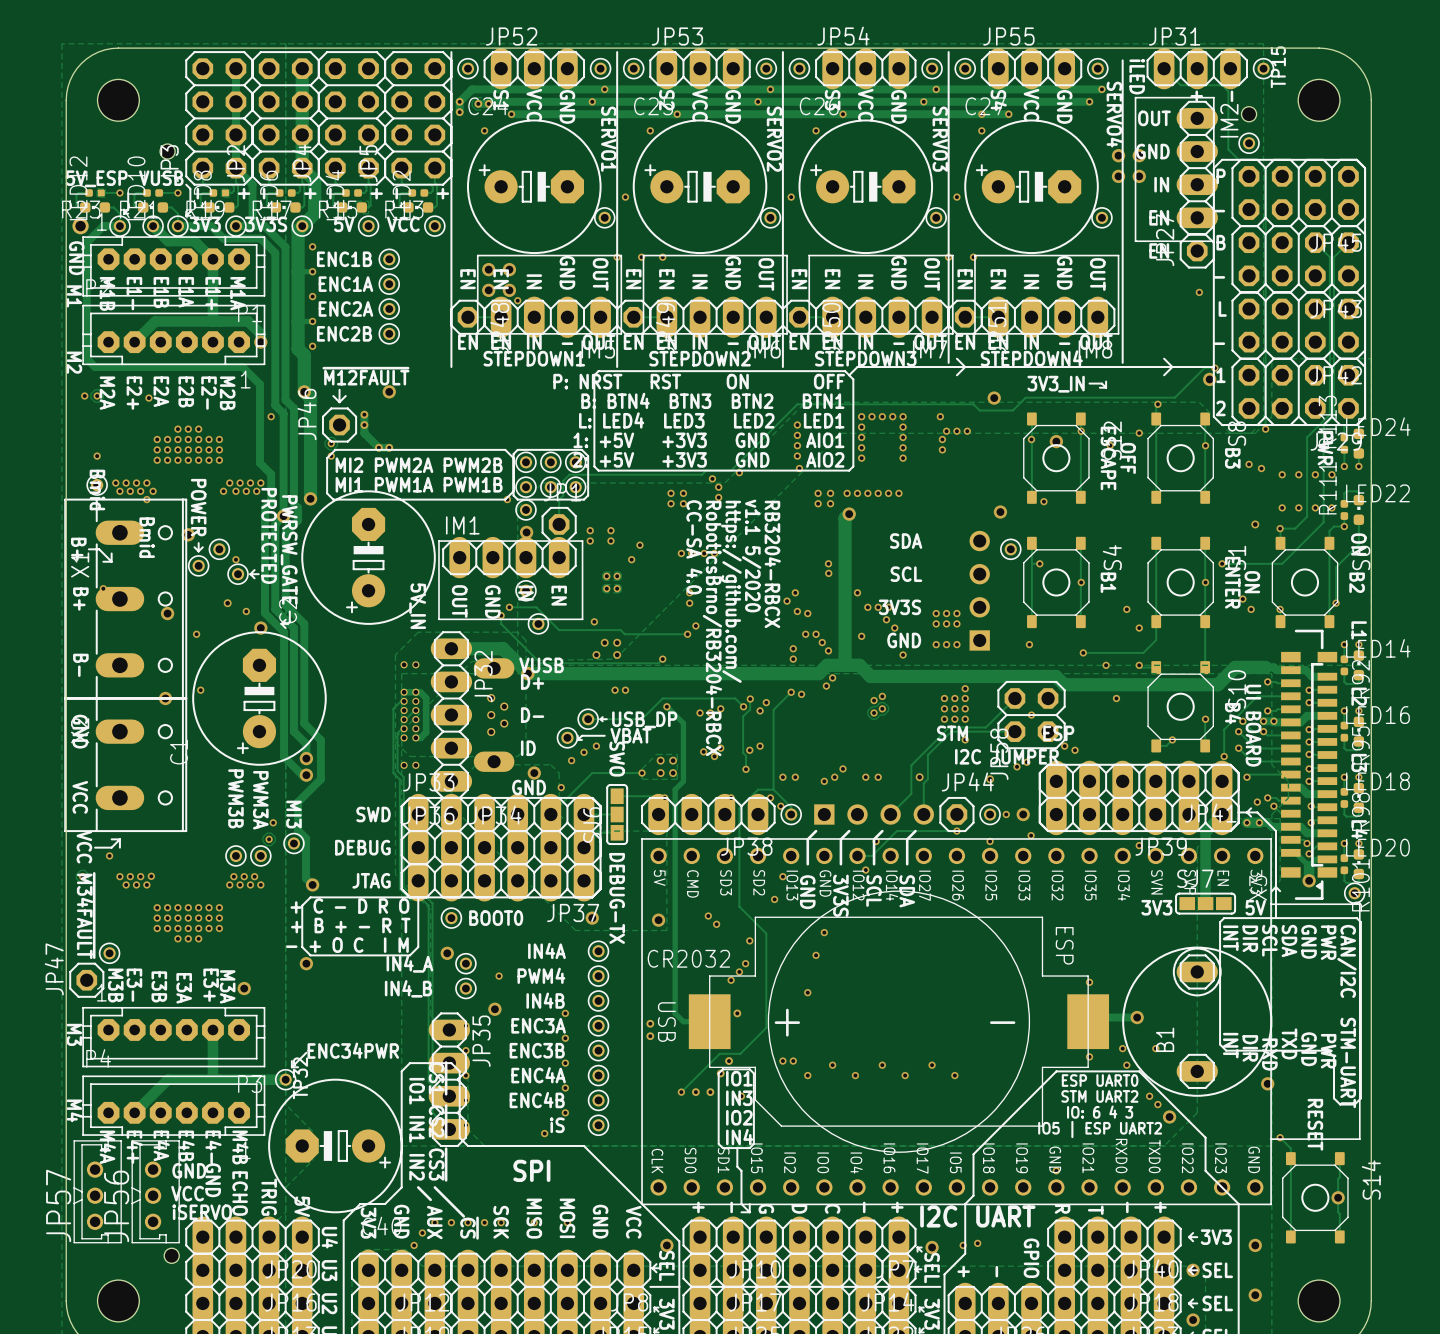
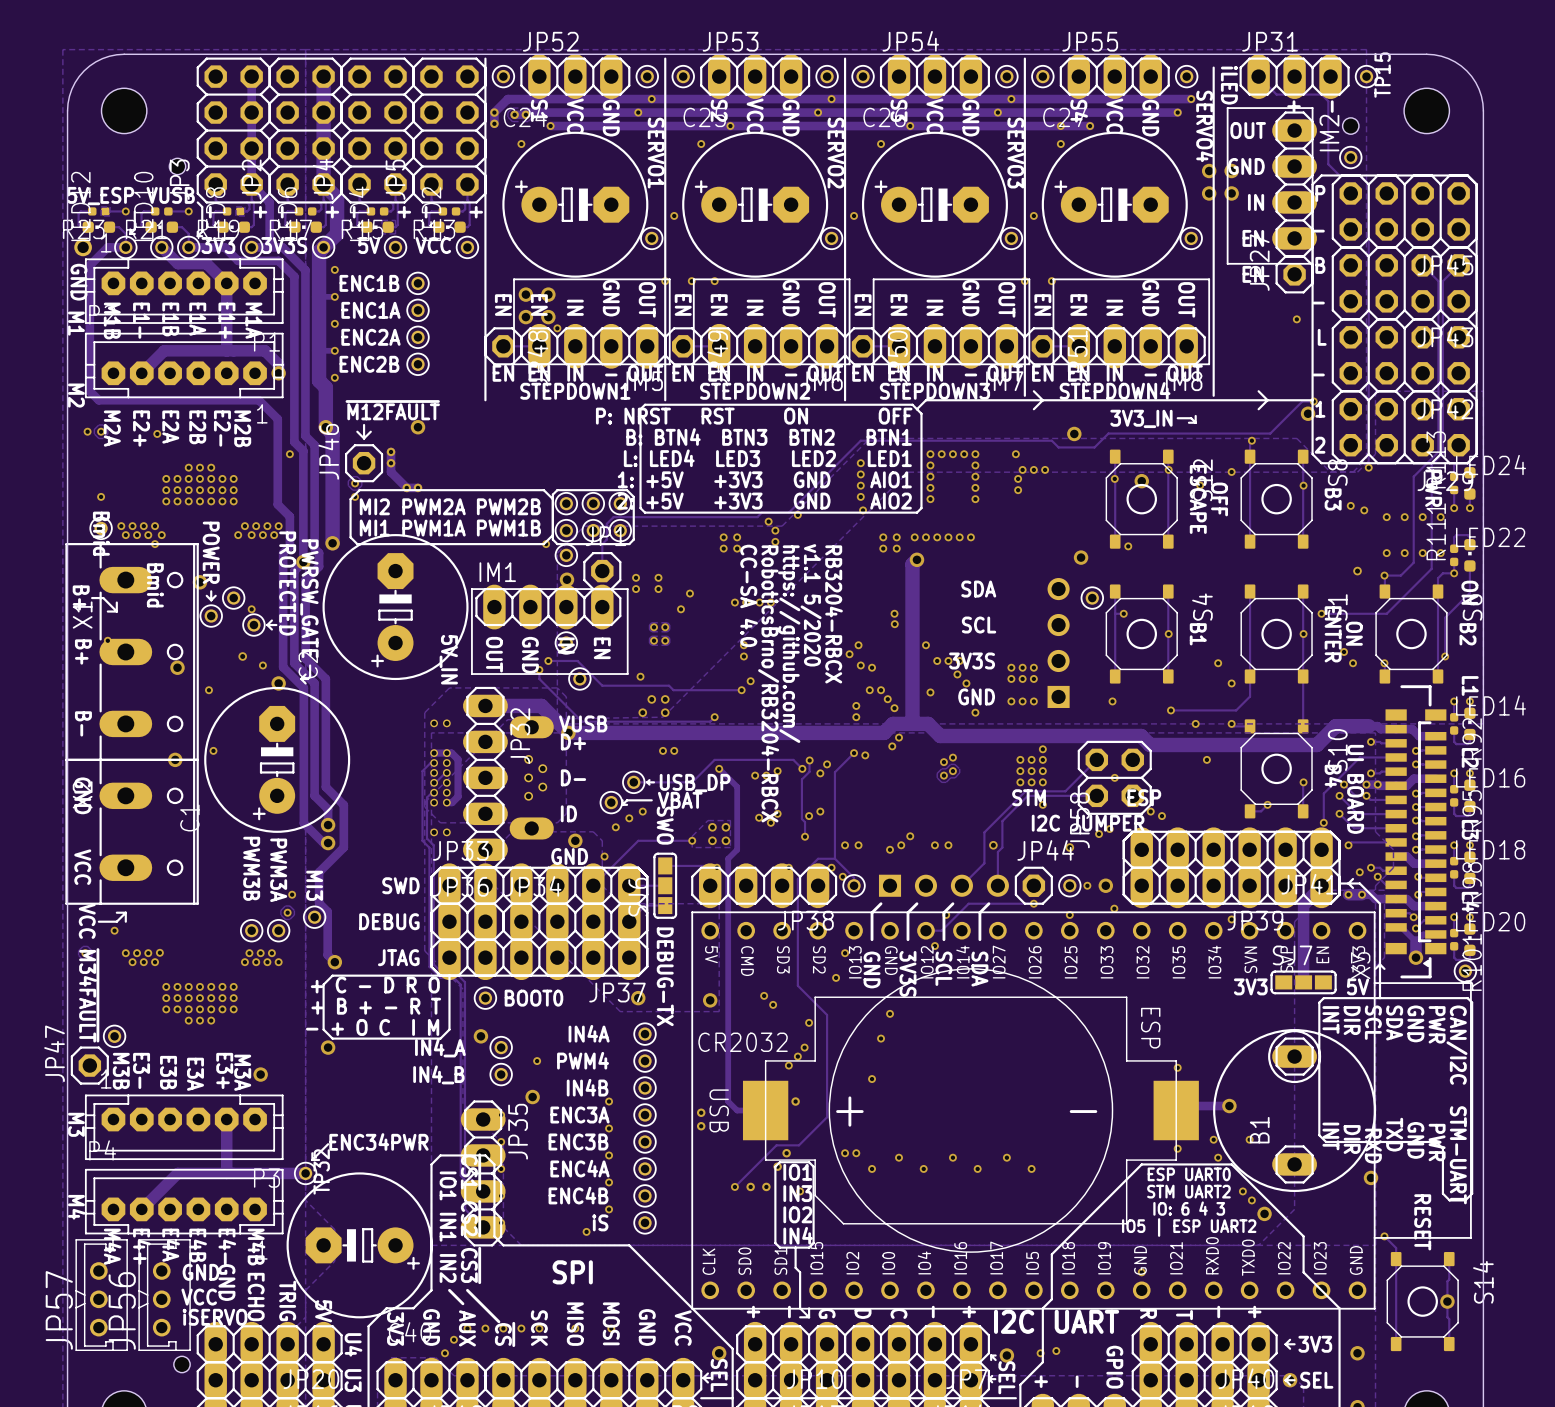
part footprint: [641, 838, 1361, 1206] -> [691, 911, 1472, 1310]

